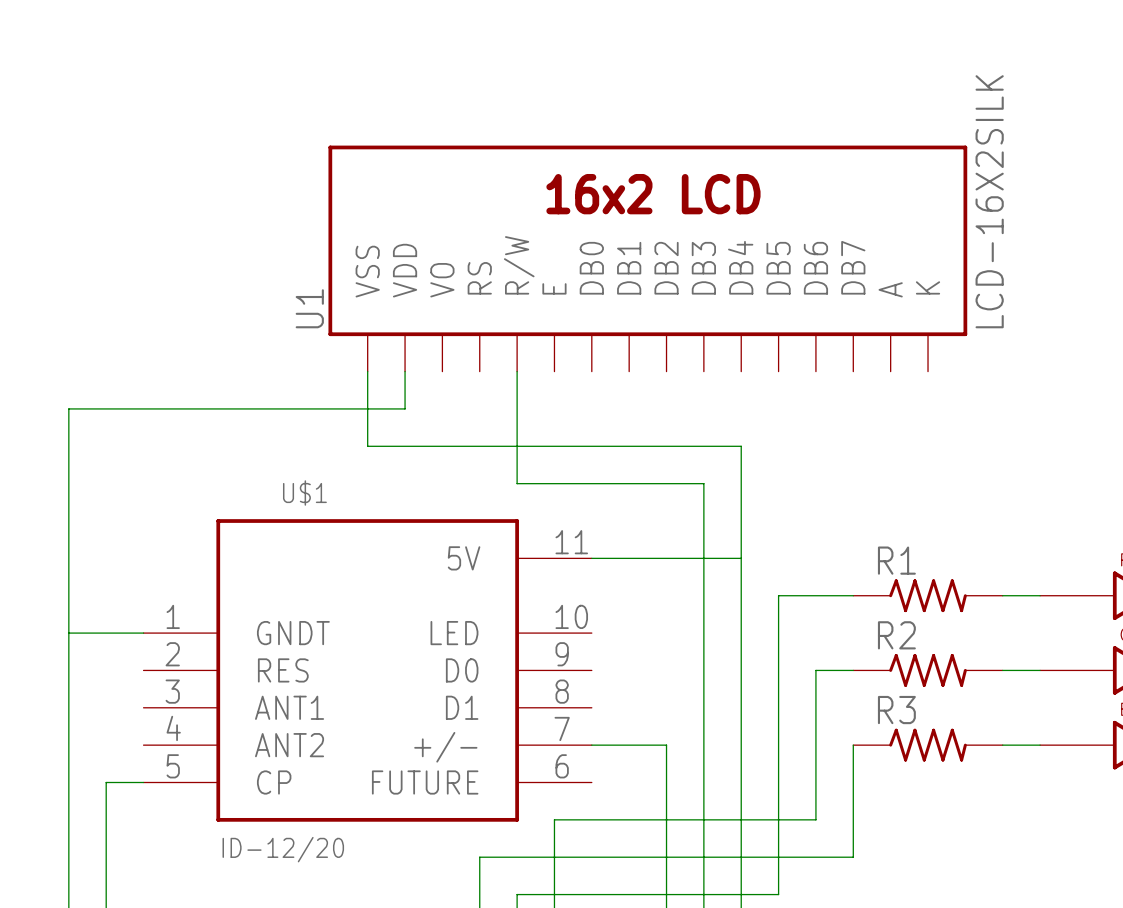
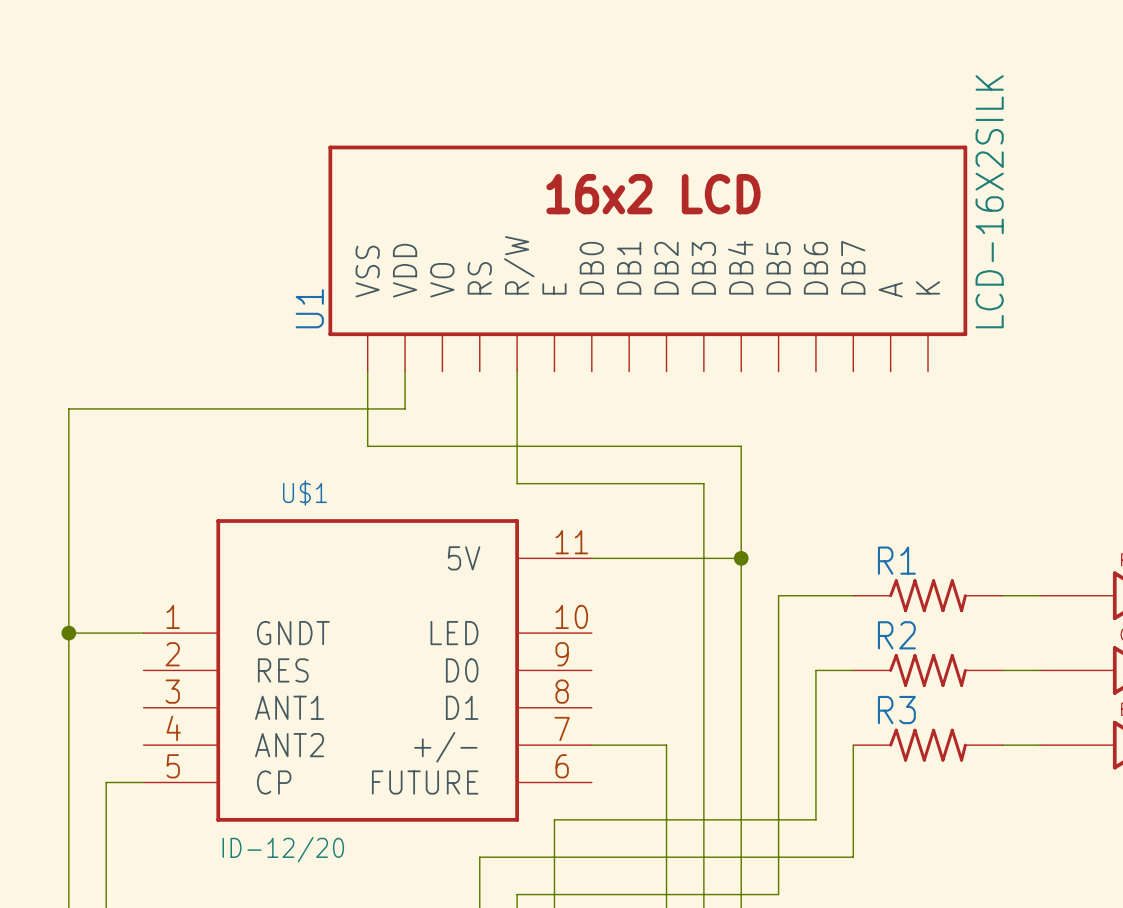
junction: none -> (741, 558)
junction: none -> (68, 633)

